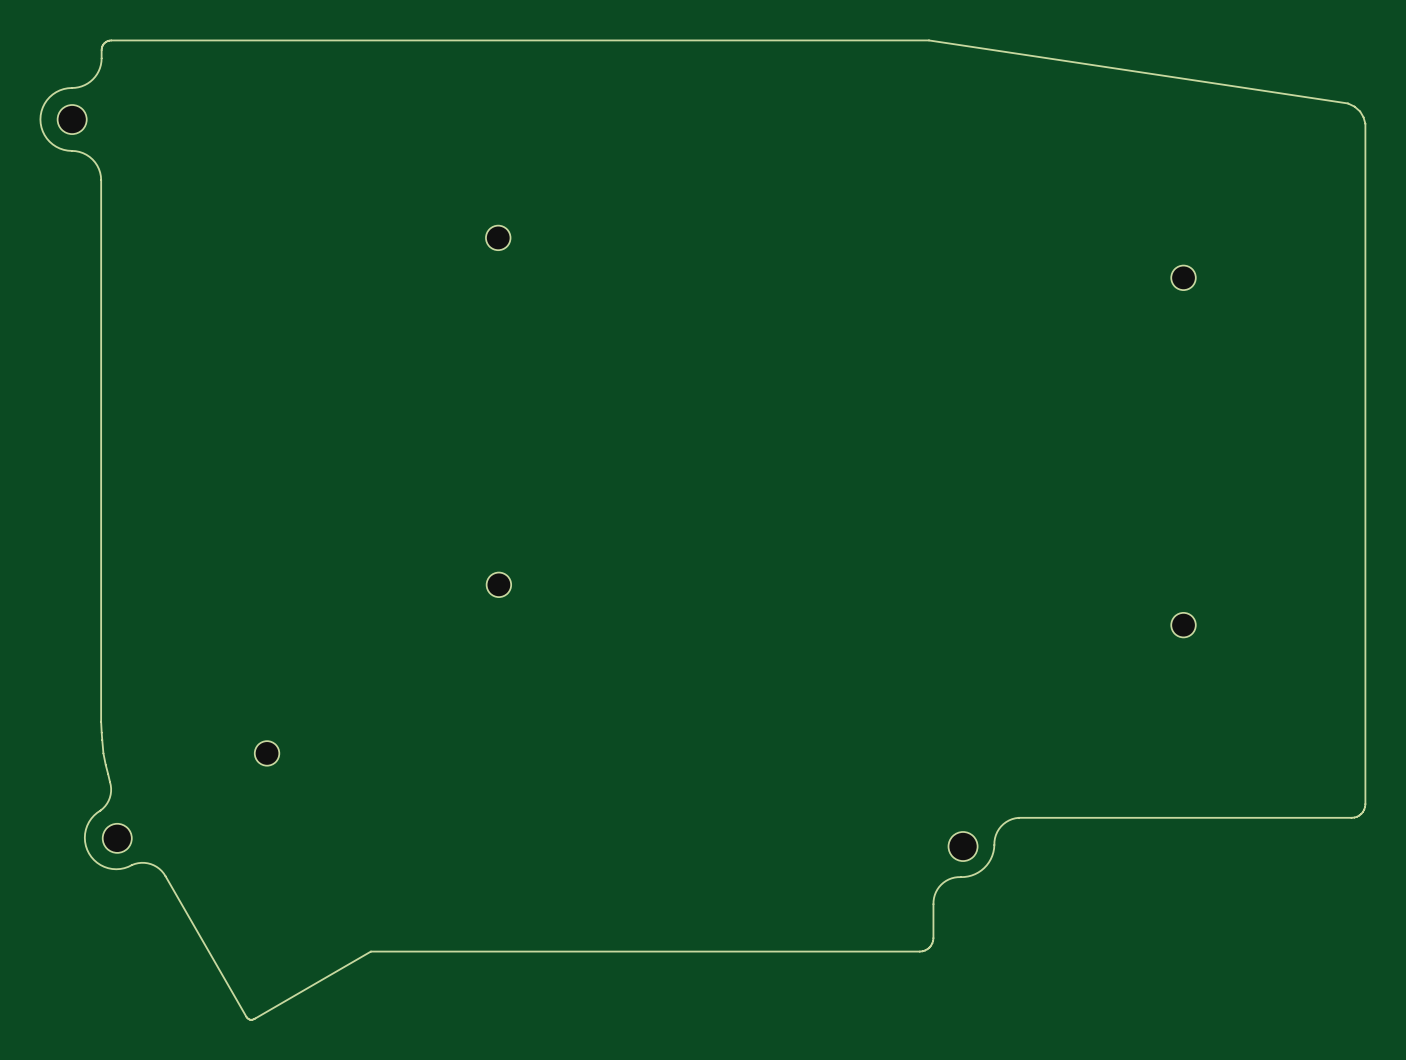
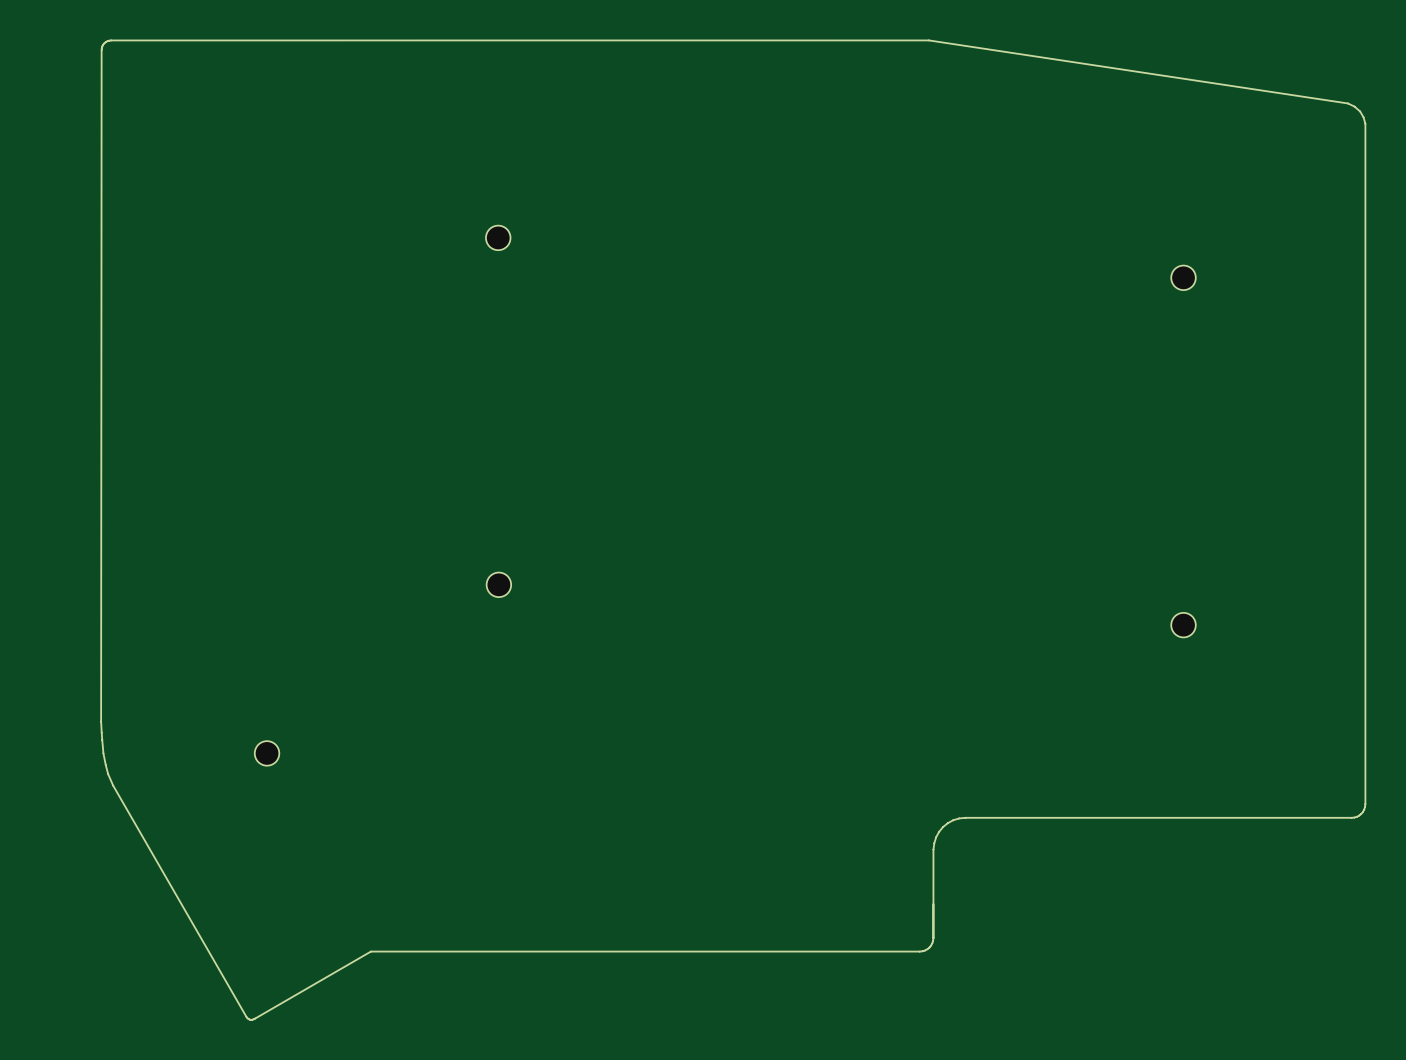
board edge: (101, 50) (100, 64) (95, 76) (84, 85) (63, 89) (52, 94) (44, 103) (40, 119) (42, 131) (49, 141) (59, 148) (79, 151) (89, 156) (97, 165) (100, 176) (101, 721) -> (101, 50) (101, 721)
part: (72, 119) -> none
board edge: (108, 774) (111, 788) (109, 797) (105, 806) (91, 818) (85, 829) (85, 841) (89, 853) (97, 862) (108, 868) (120, 868) (144, 862) (153, 865) (161, 871) (246, 1016) -> (108, 774) (246, 1016)
board edge: (1018, 817) (1009, 820) (998, 829) (994, 838) (992, 855) (984, 868) (971, 875) (954, 877) (943, 882) (935, 892) (933, 904) -> (1018, 817) (959, 818) (947, 823) (939, 831) (933, 849) (933, 938)
part: (117, 838) -> none
part: (963, 846) -> none

